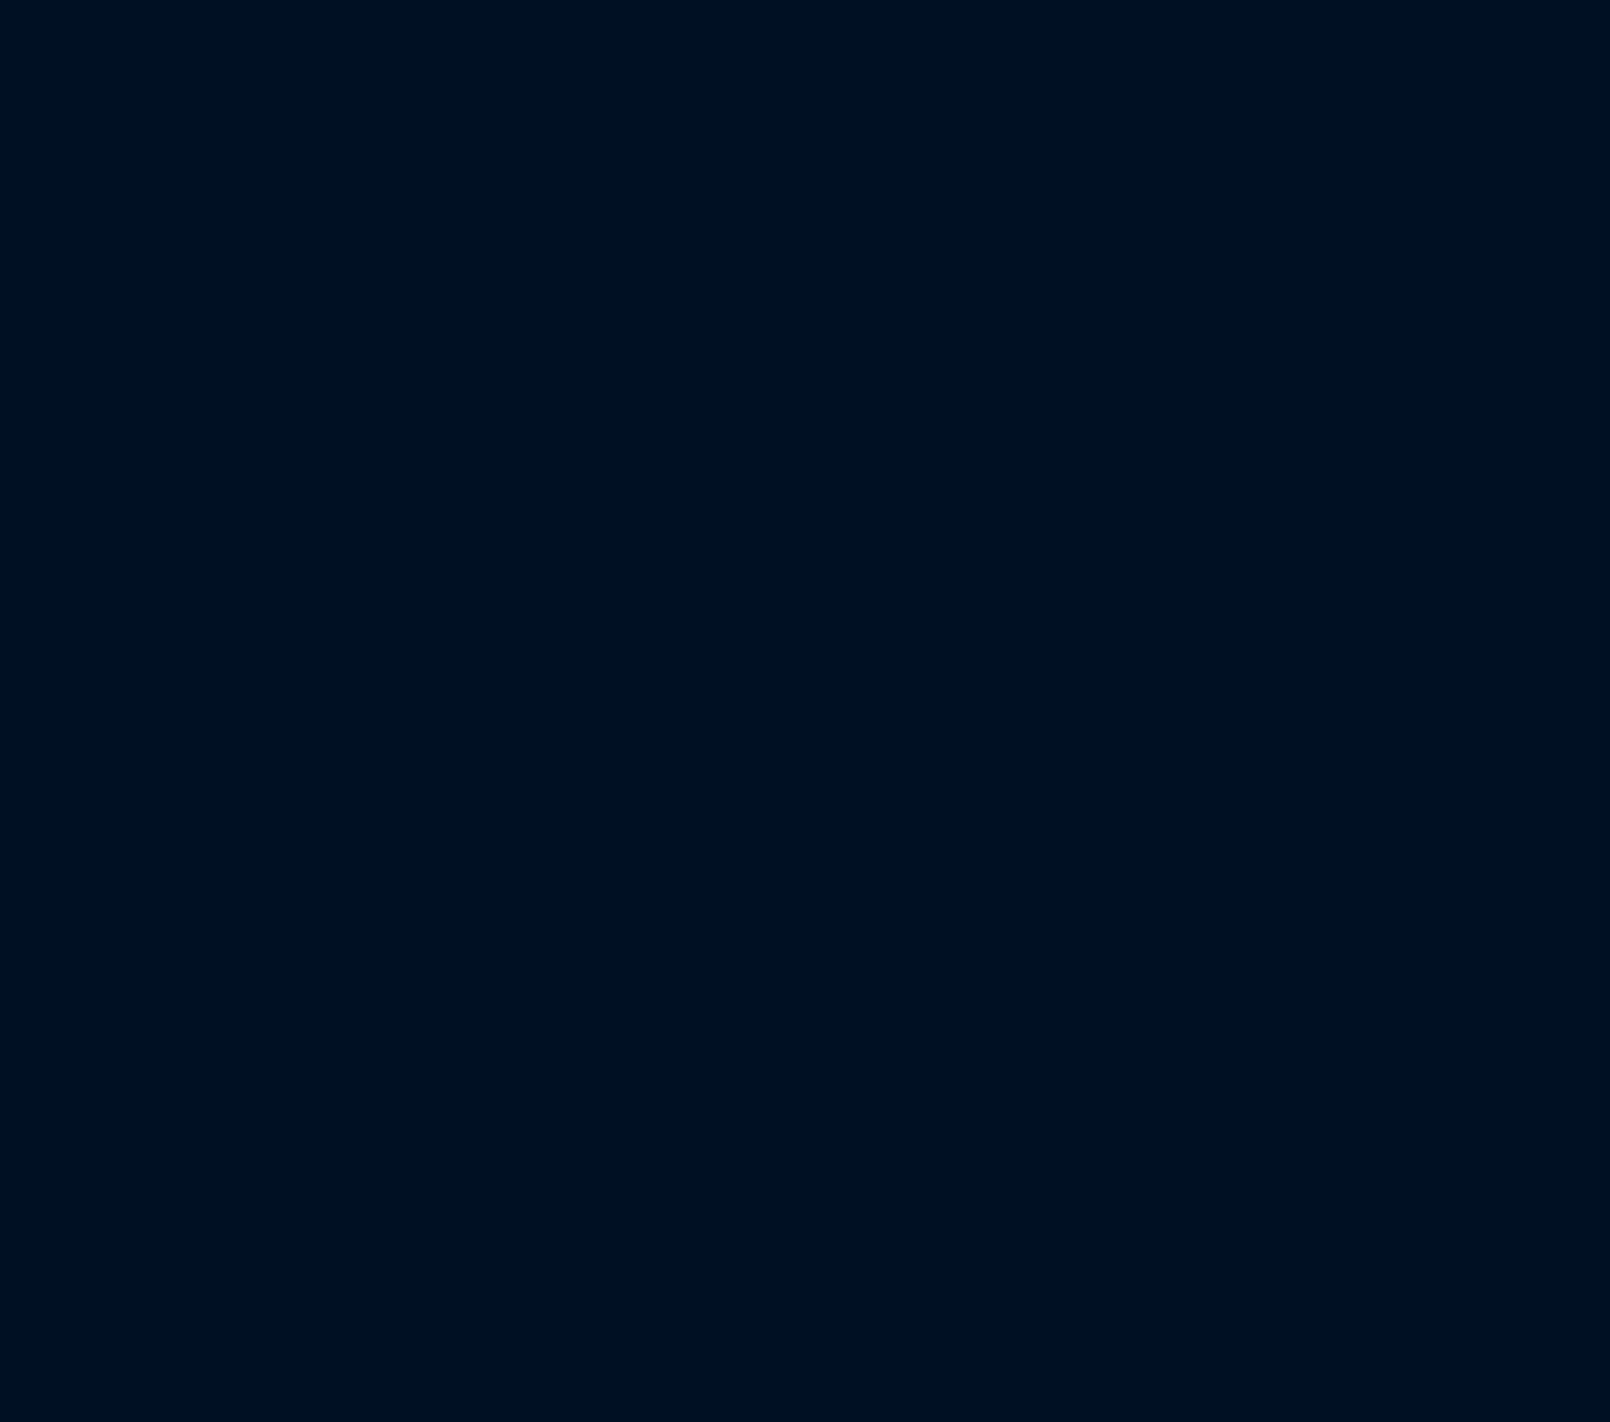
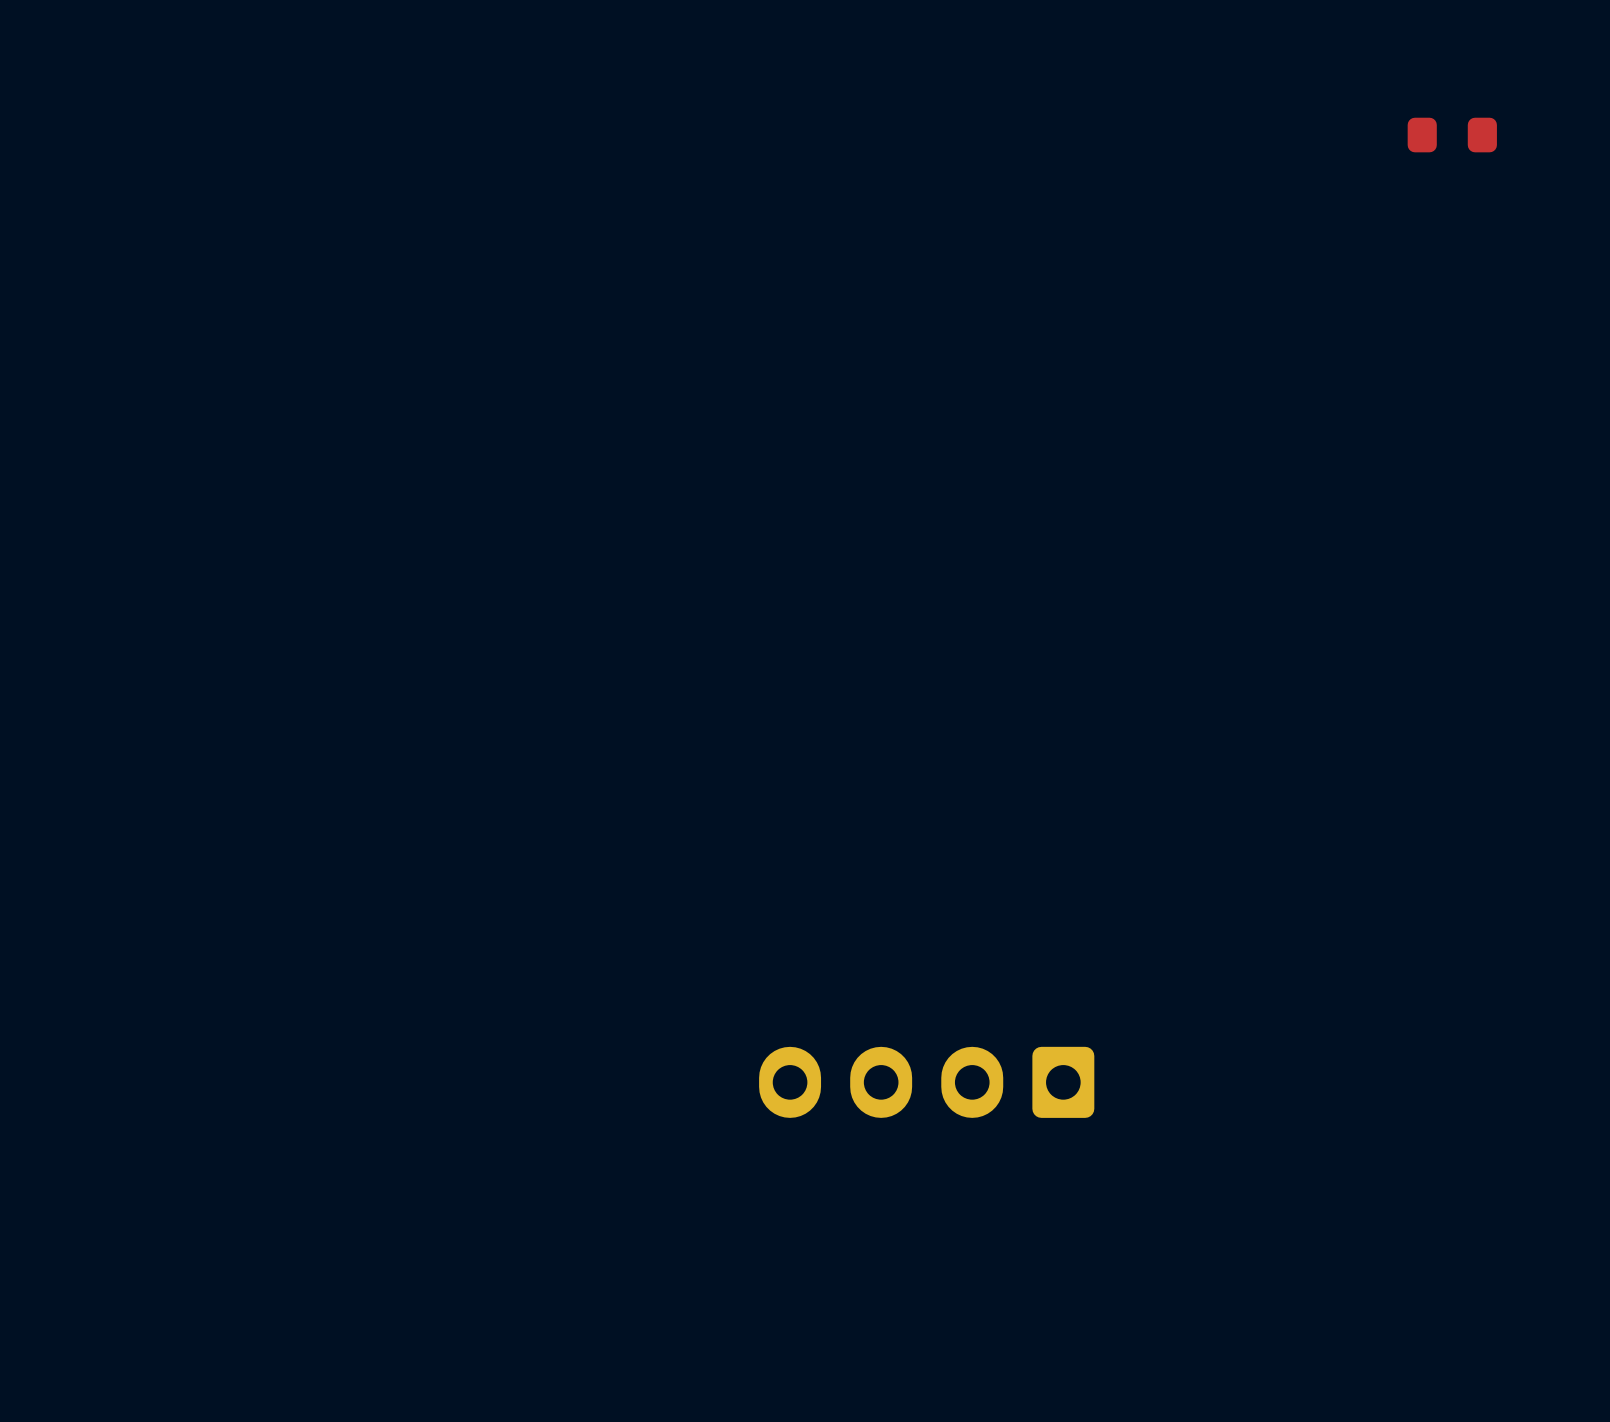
part: none -> (1452, 135)
part: none -> (926, 1082)

